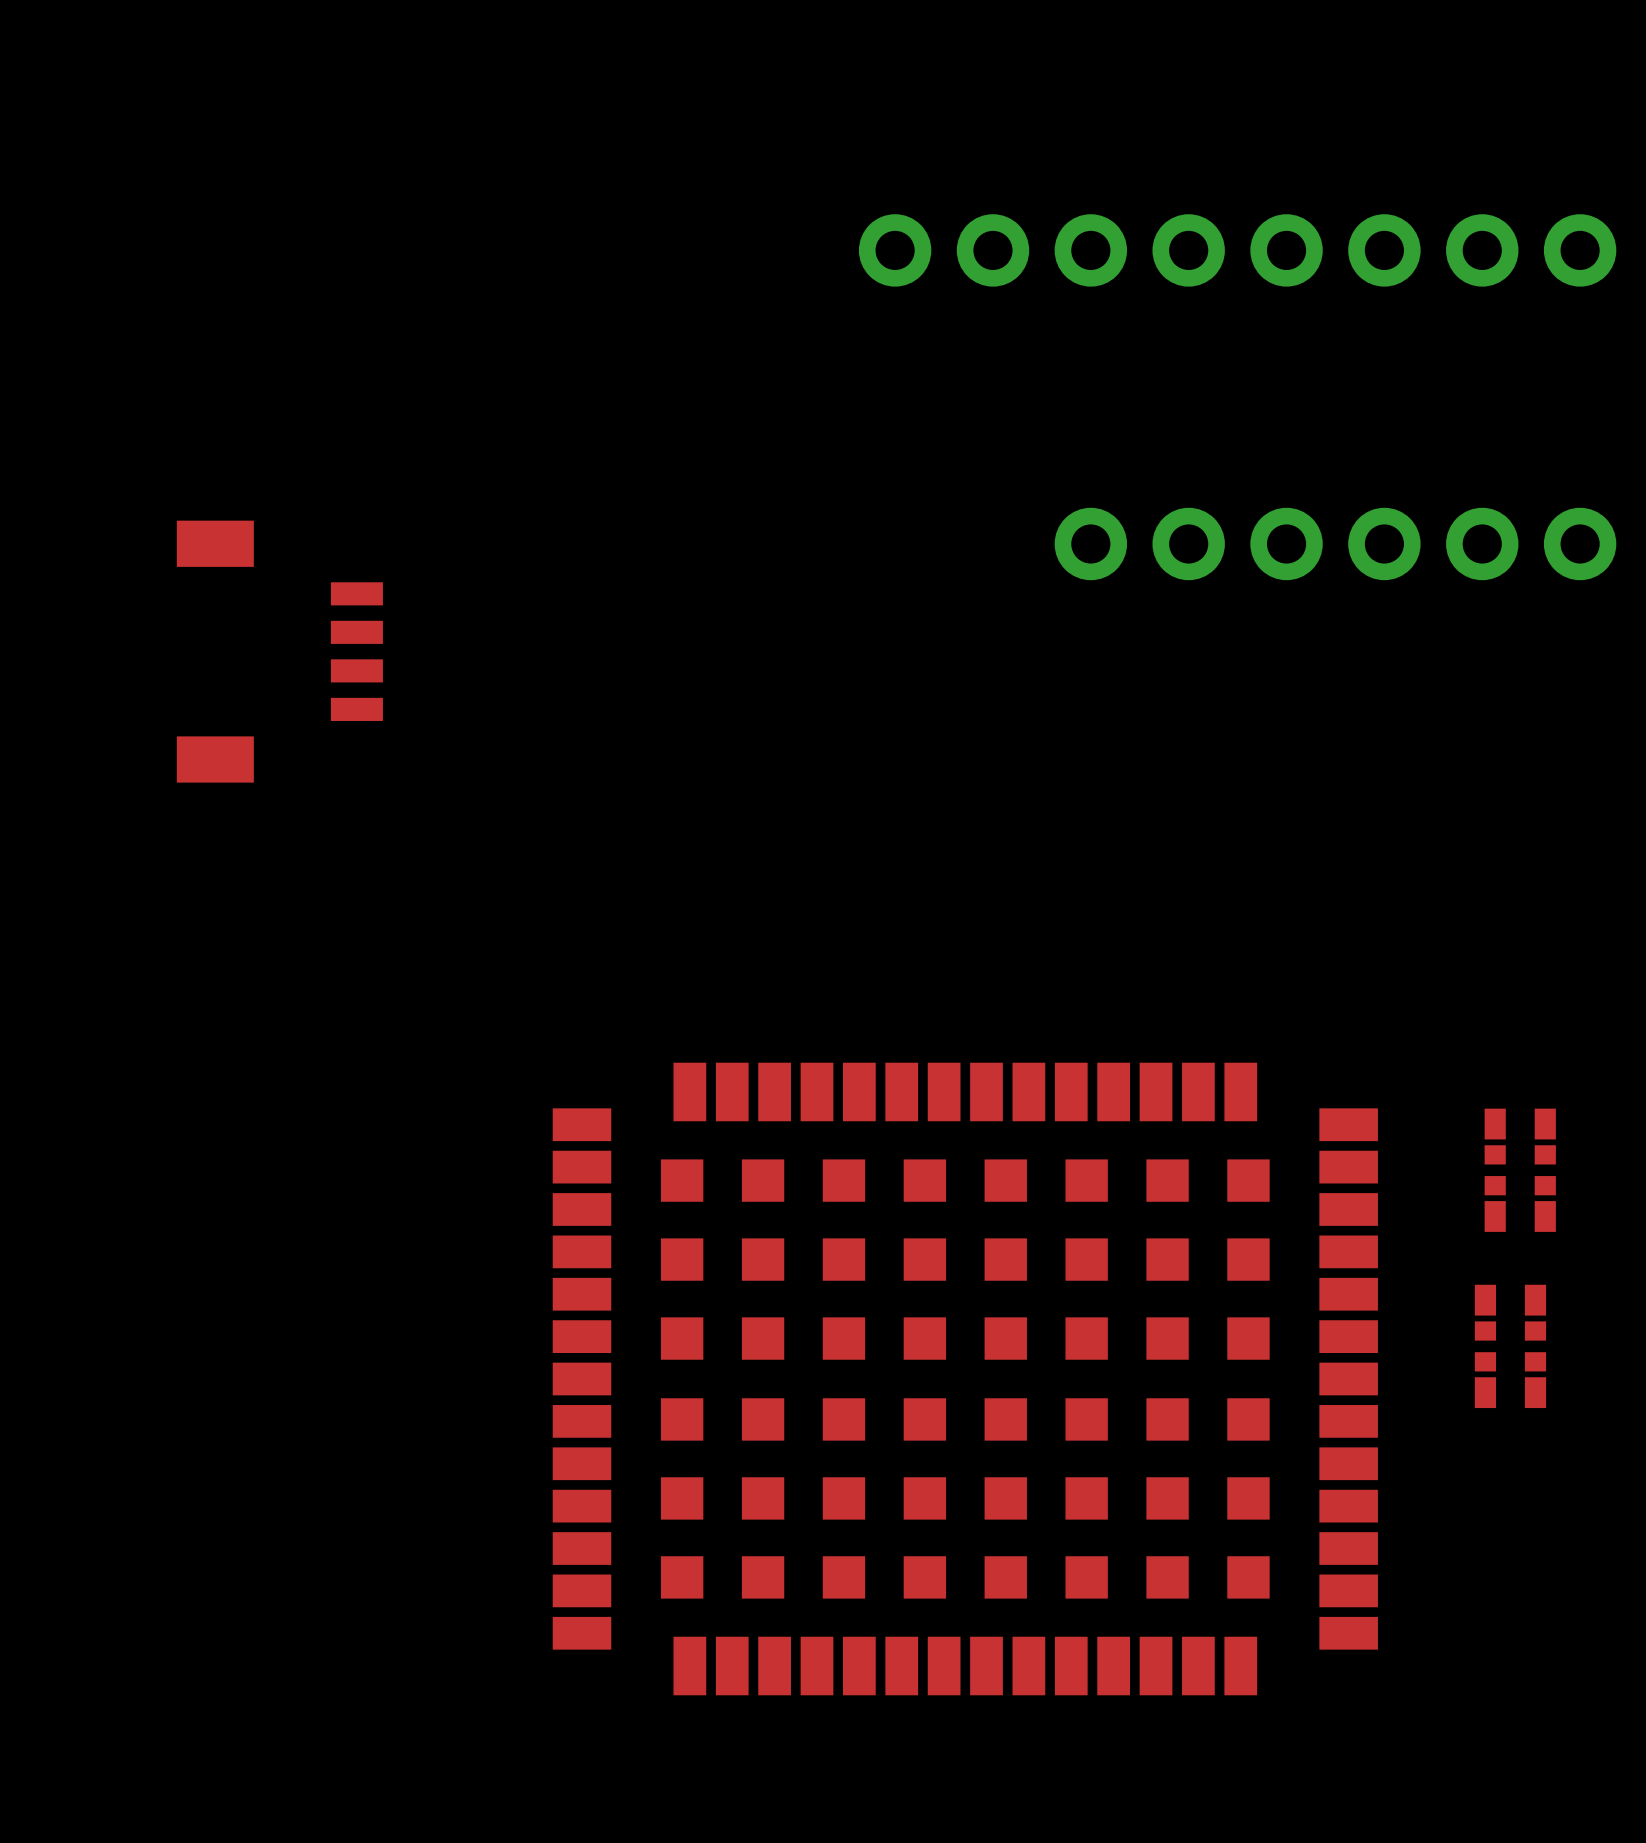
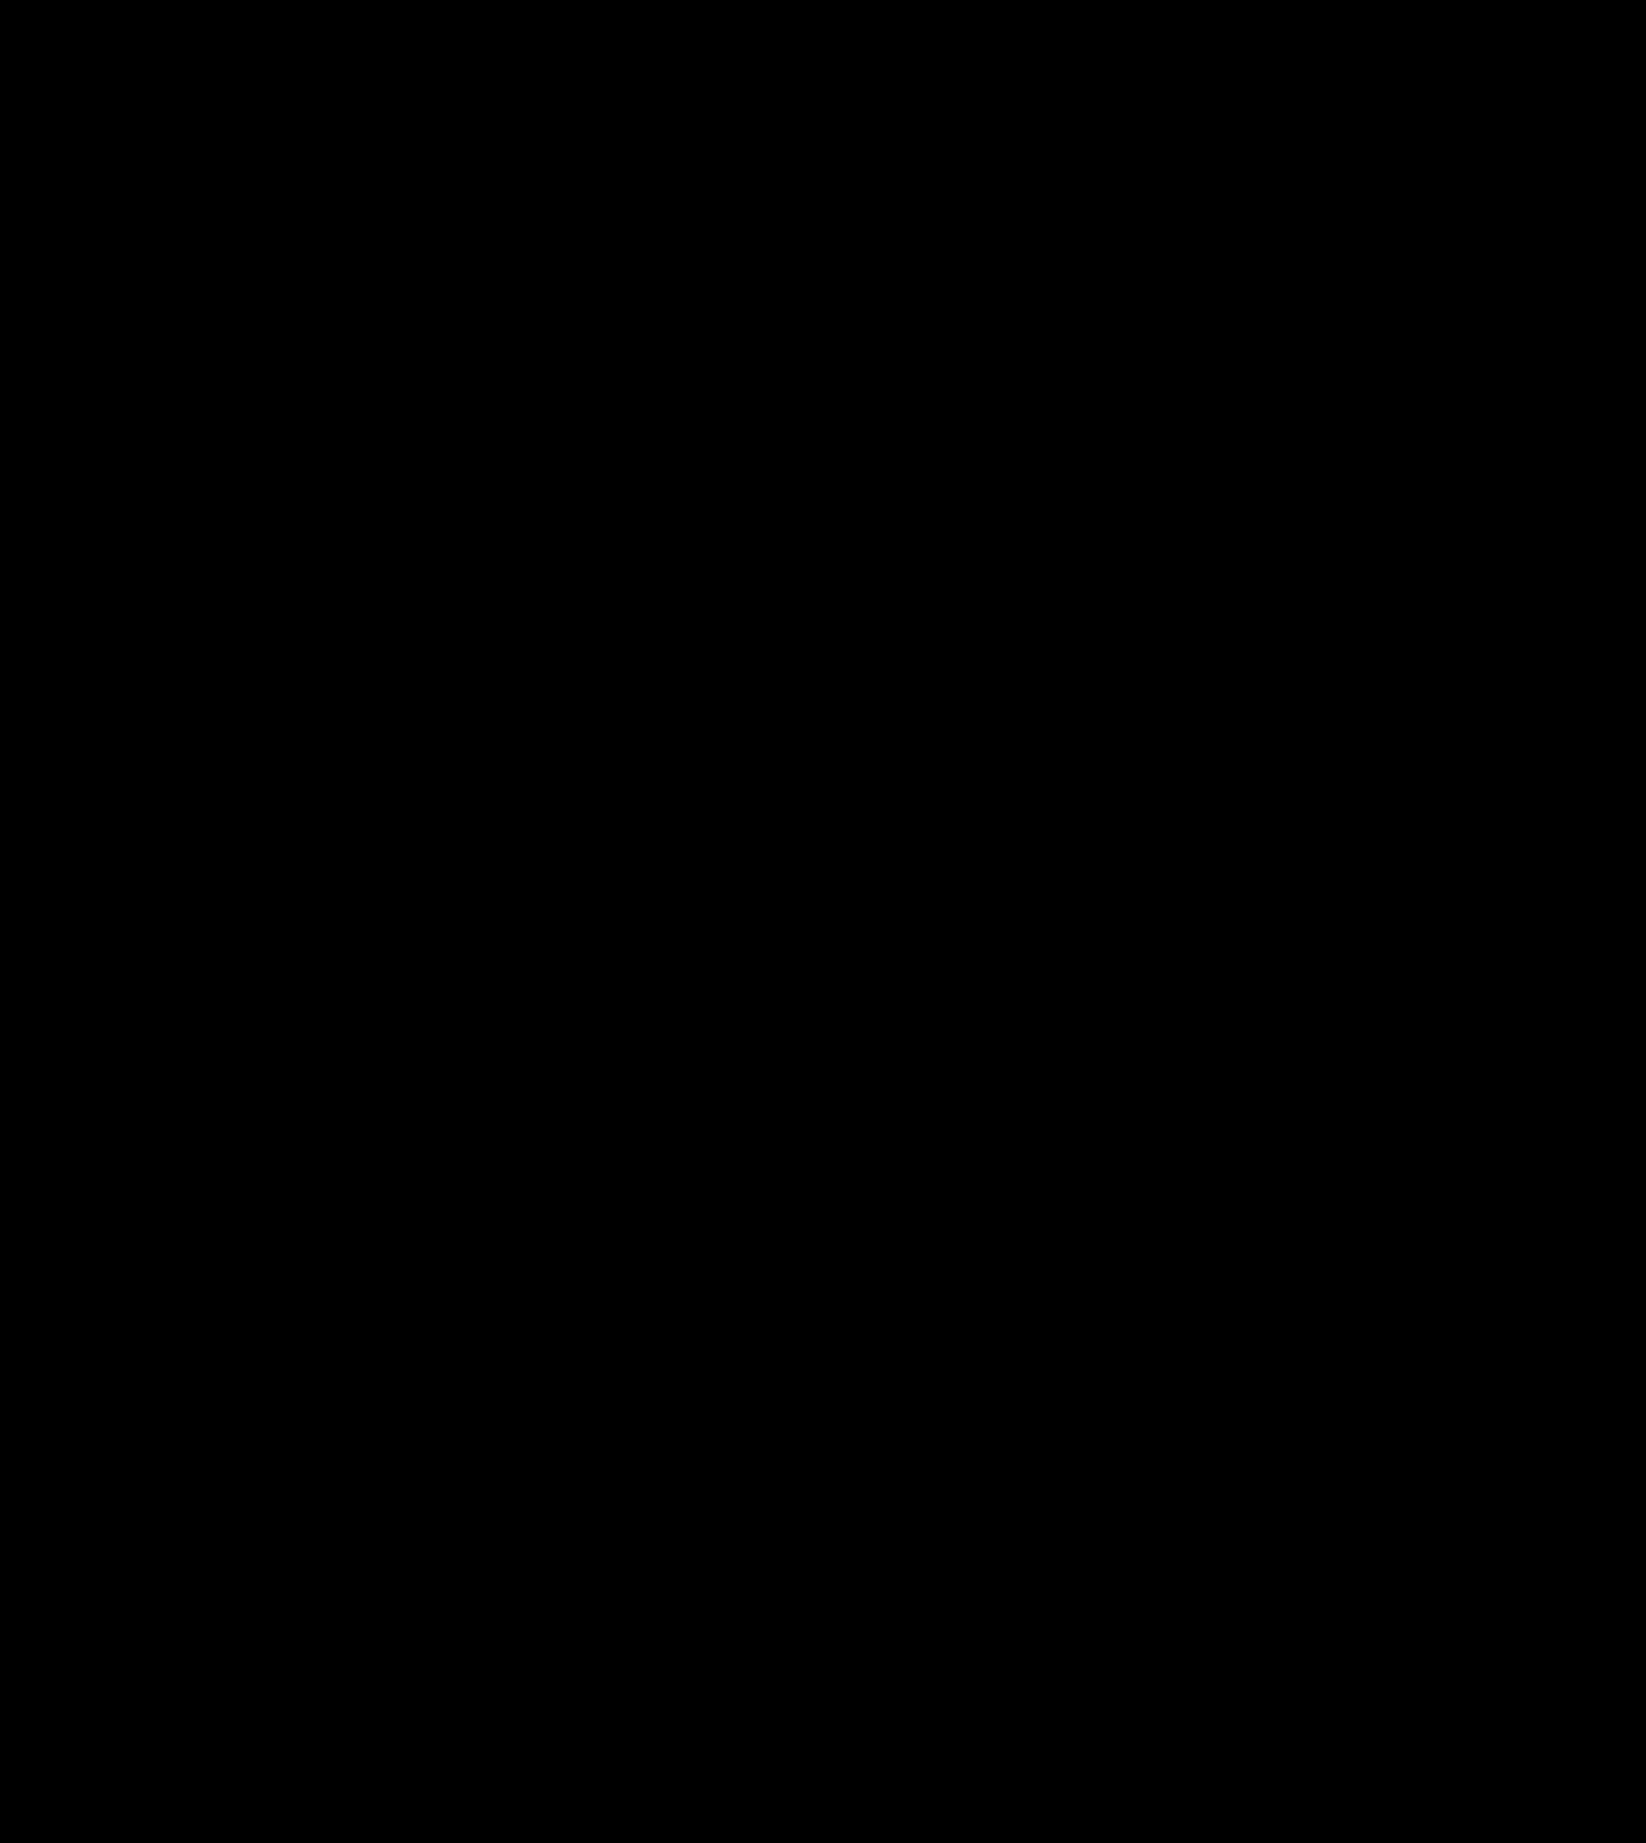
part: (1237, 250) -> none
part: (1335, 543) -> none
part: (279, 651) -> none
part: (1520, 1170) -> none
part: (1510, 1346) -> none
part: (965, 1379) -> none

